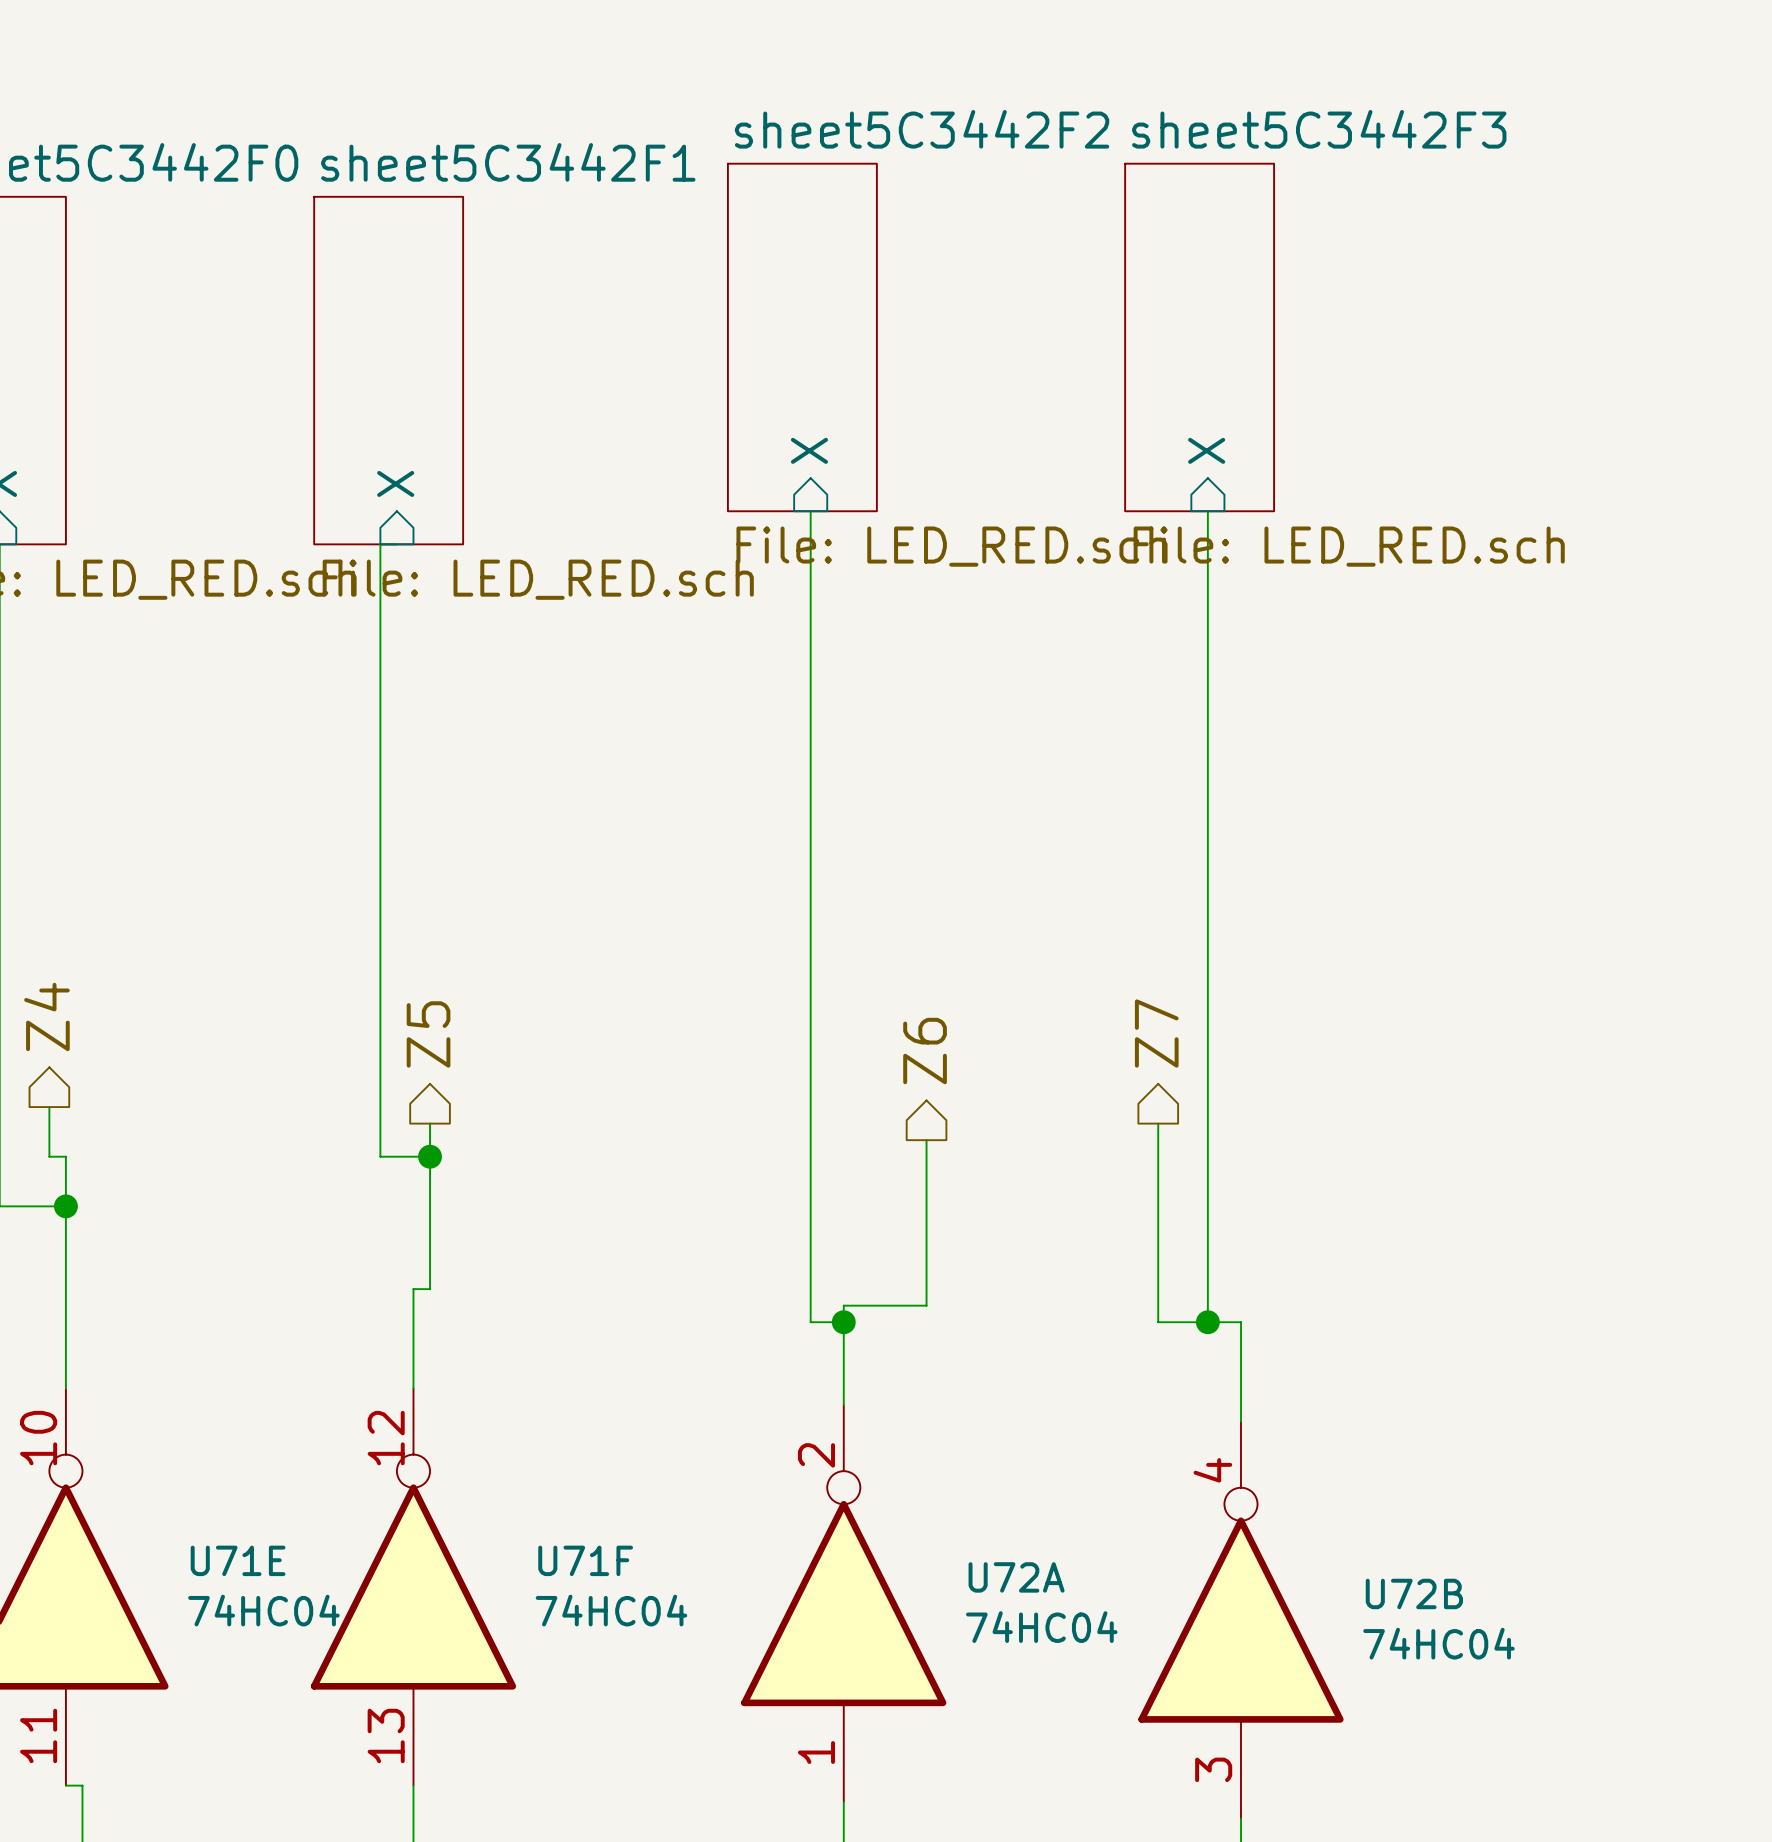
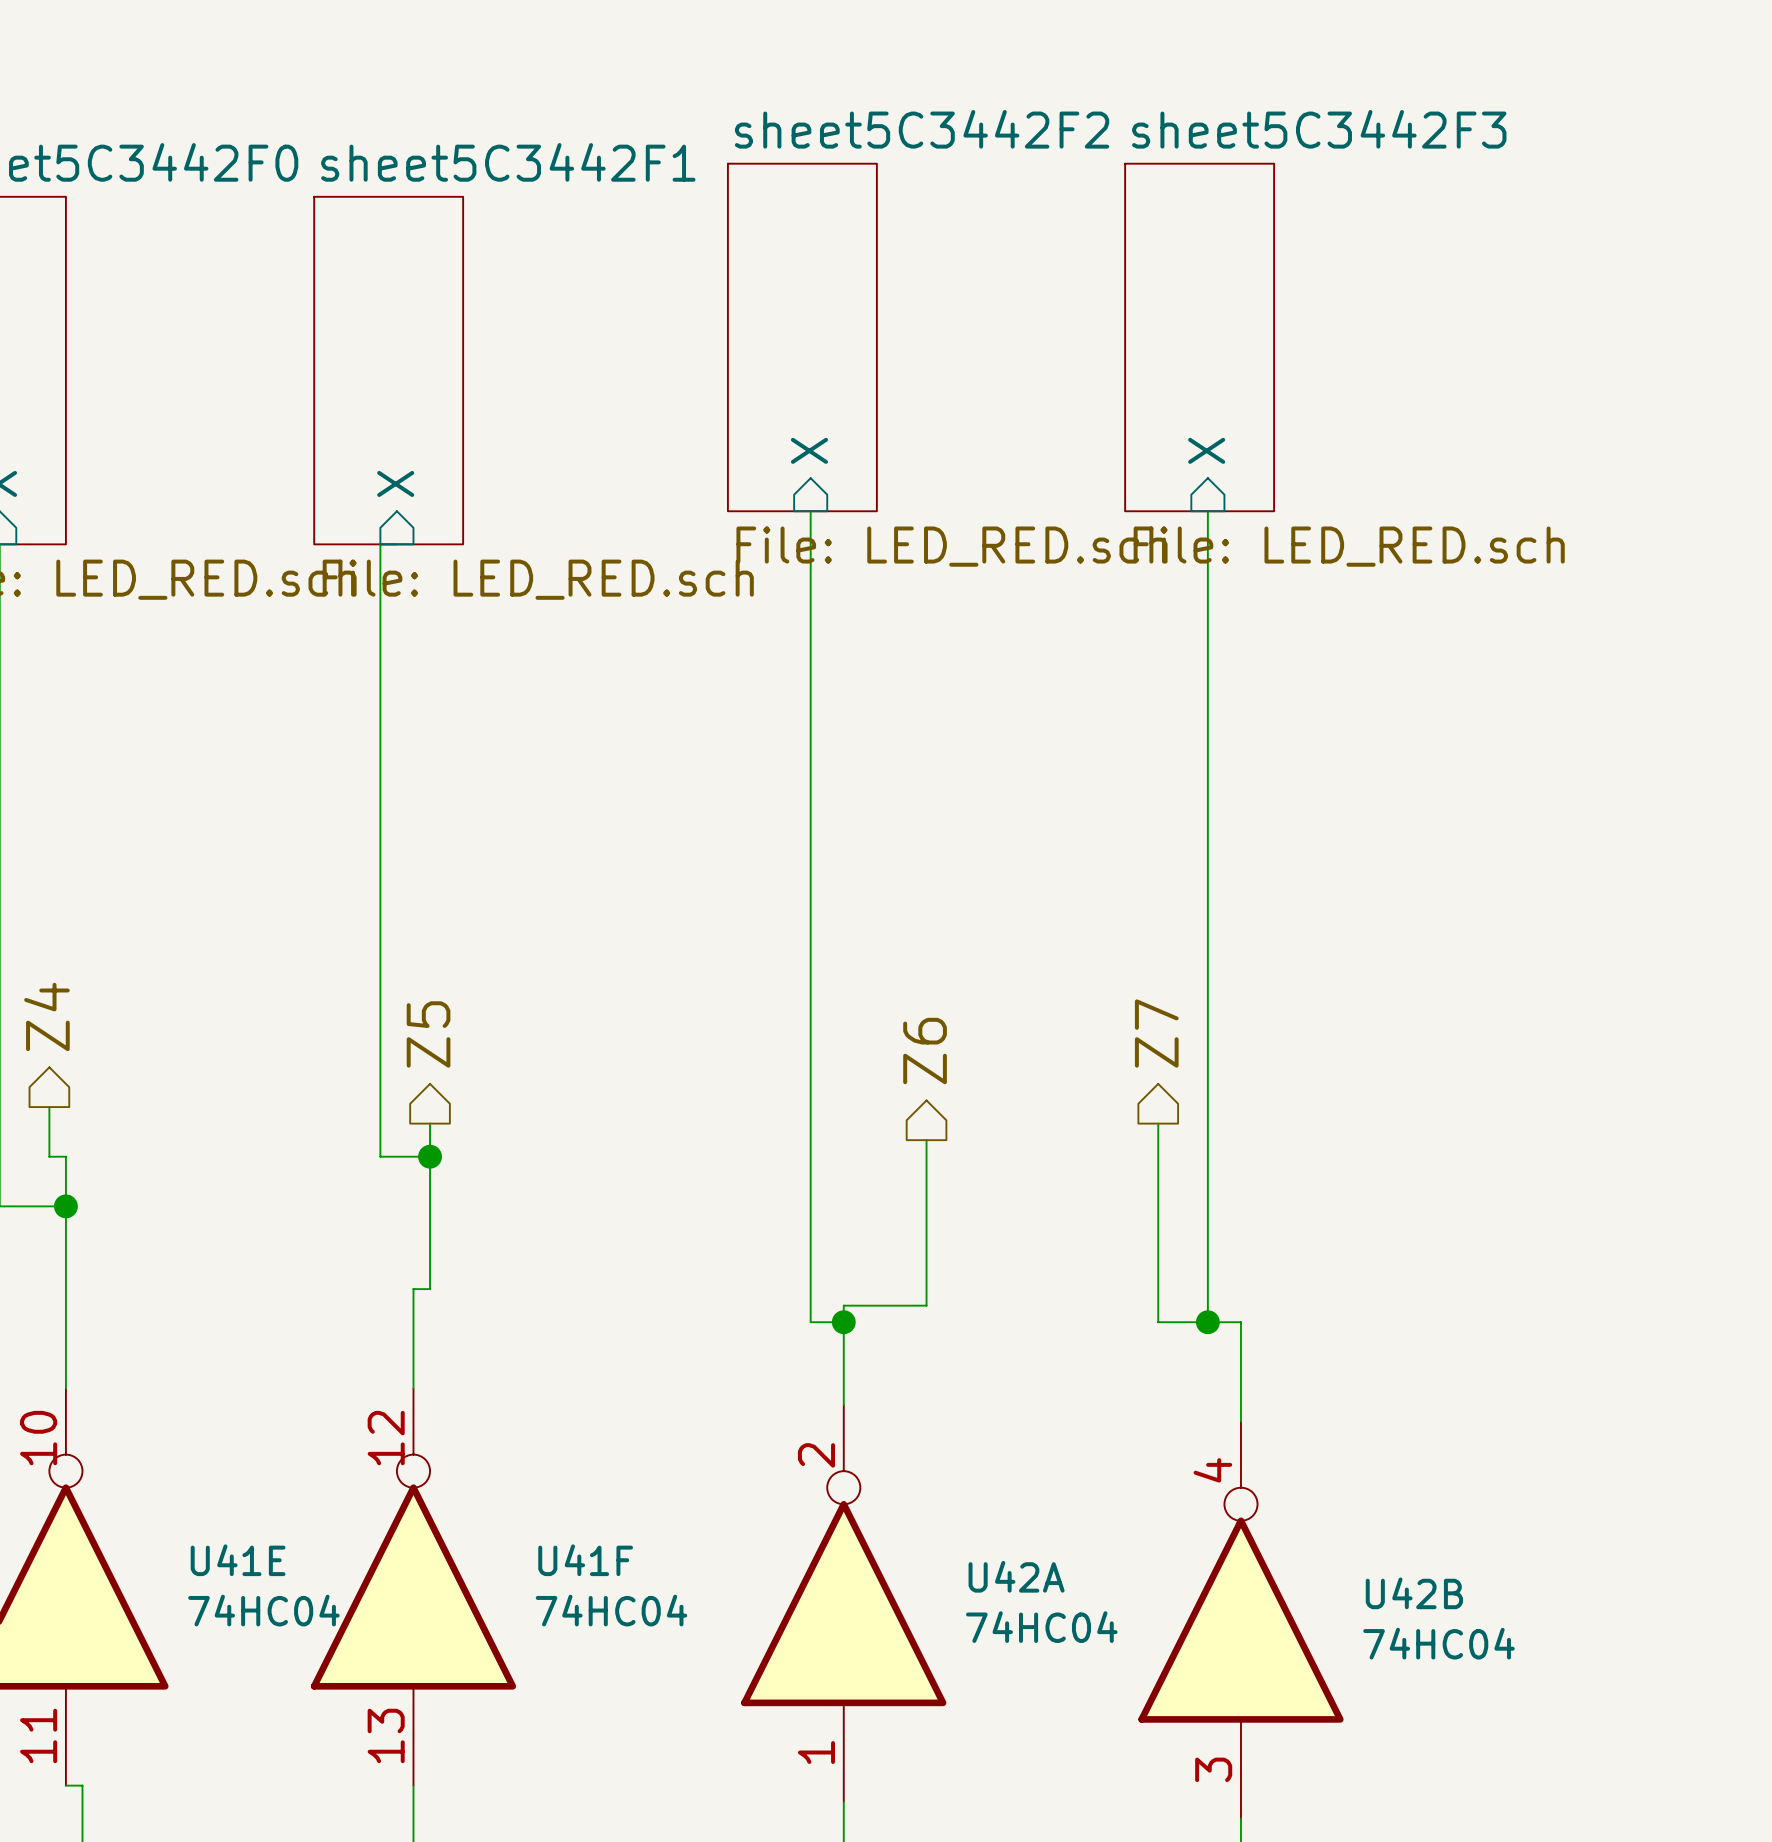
U71E name: U71E (238, 1560) -> U41E (238, 1560)
U71F name: U71F (585, 1560) -> U41F (585, 1560)
U72A name: U72A (1016, 1577) -> U42A (1016, 1576)
U72B name: U72B (1414, 1593) -> U42B (1414, 1593)

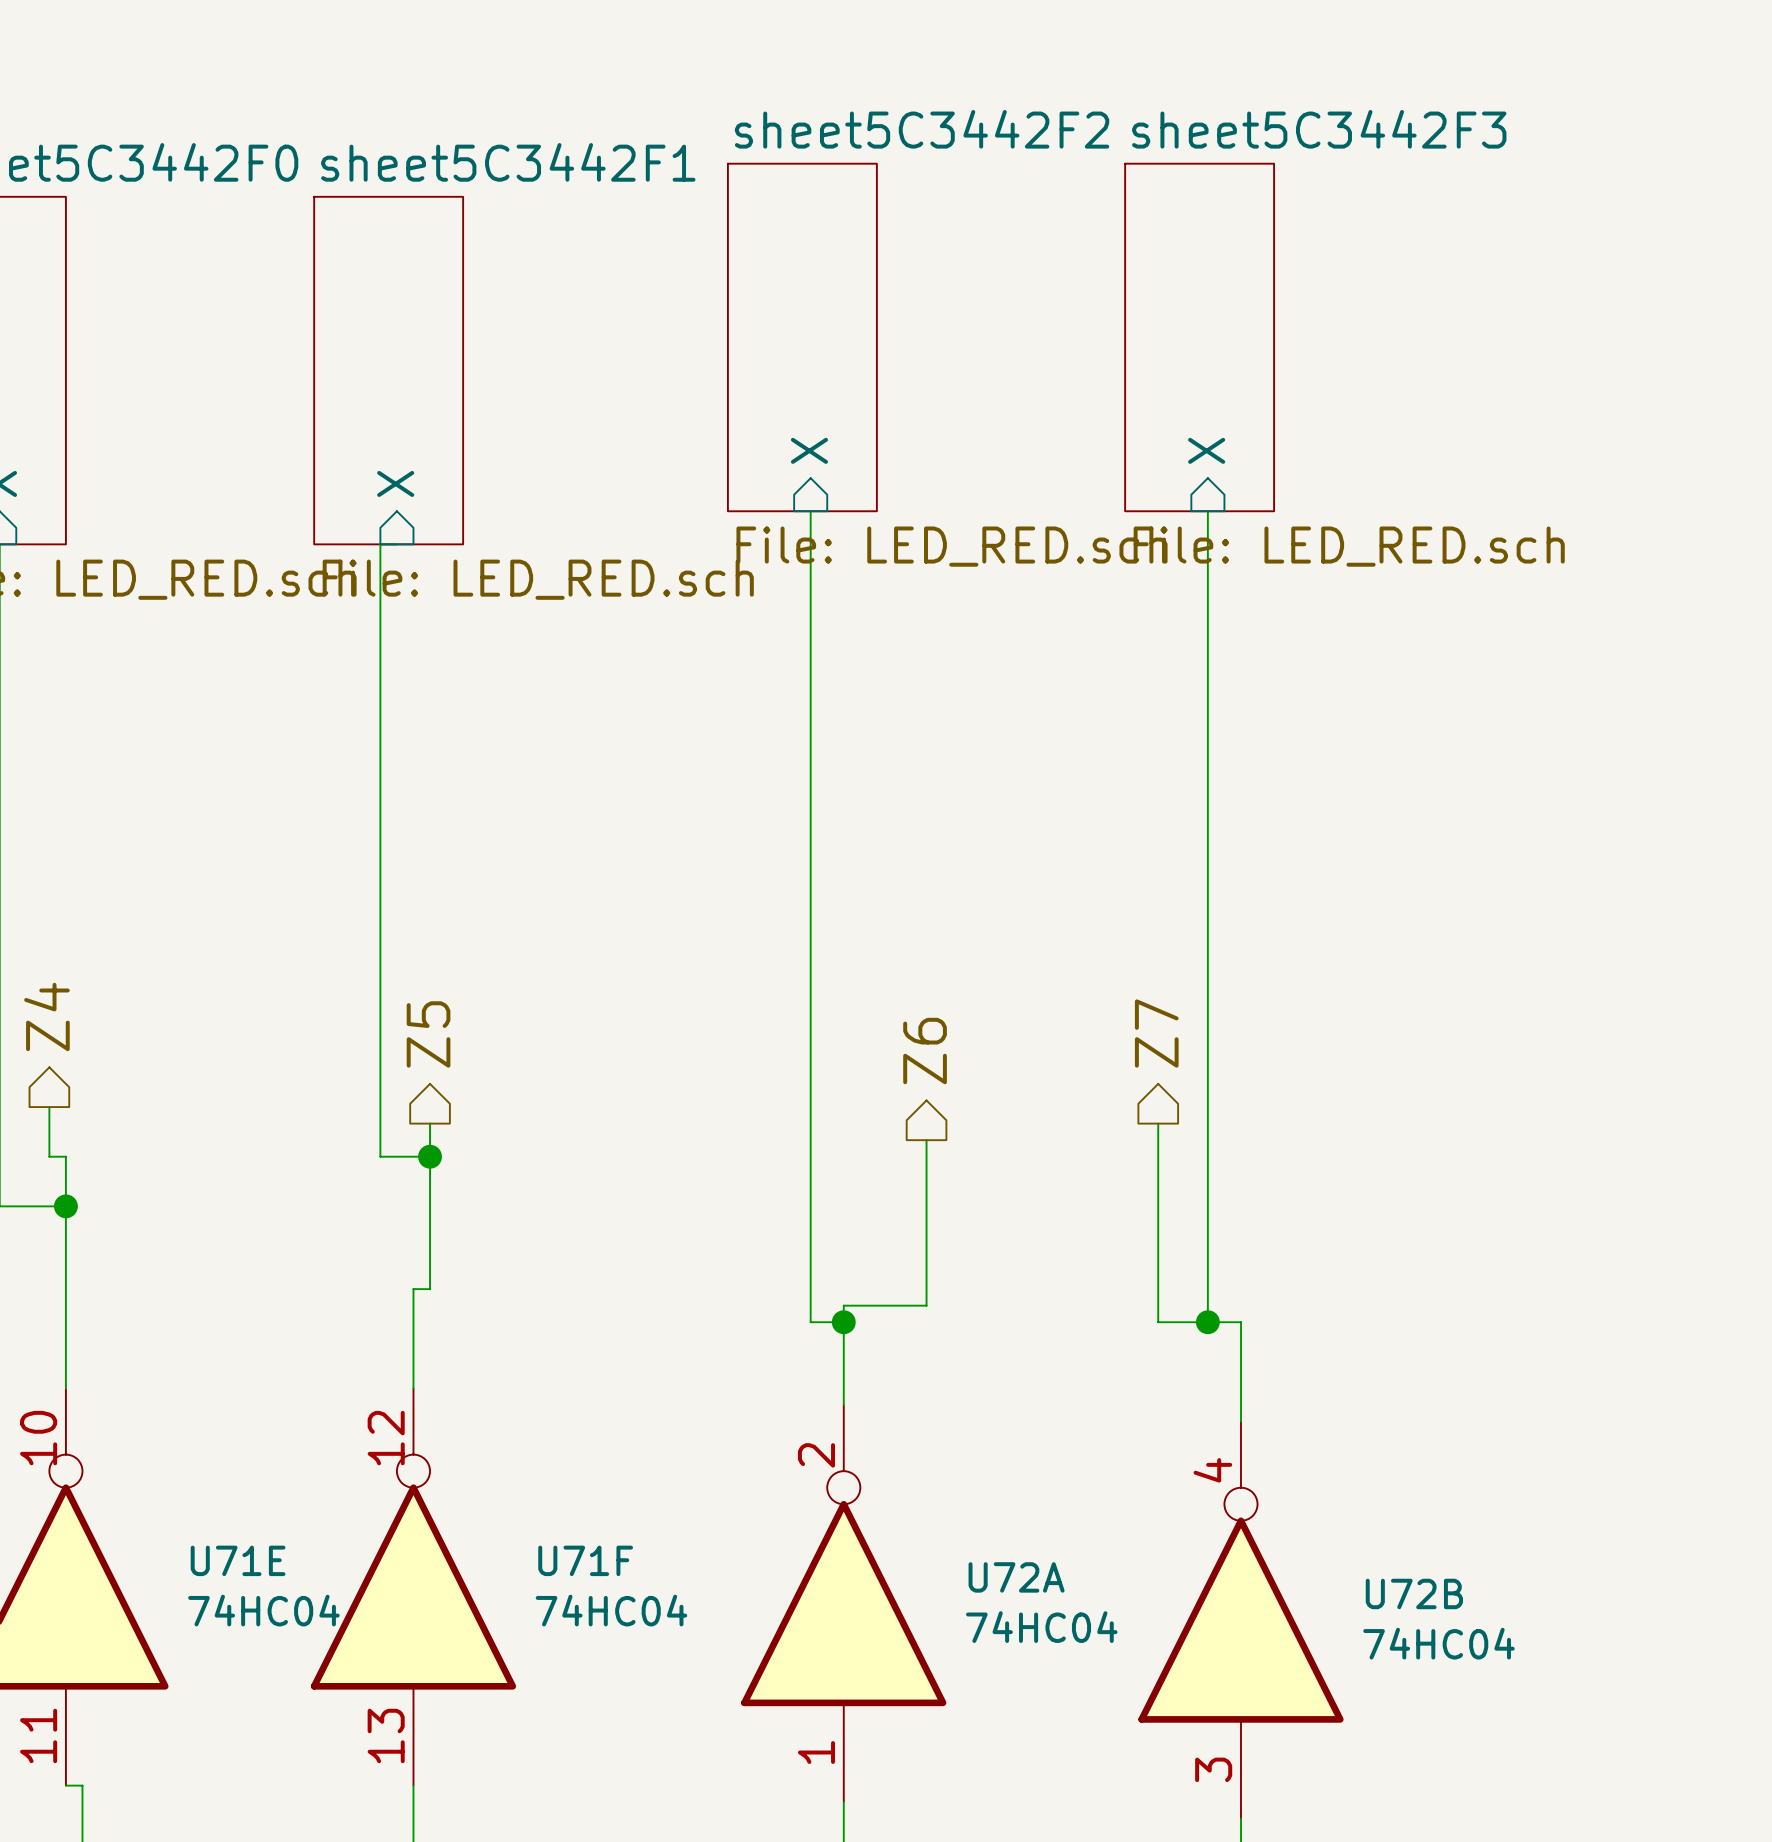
U41E name: U41E (238, 1560) -> U71E (238, 1560)
U41F name: U41F (585, 1560) -> U71F (585, 1560)
U42A name: U42A (1016, 1576) -> U72A (1016, 1577)
U42B name: U42B (1414, 1593) -> U72B (1414, 1593)

